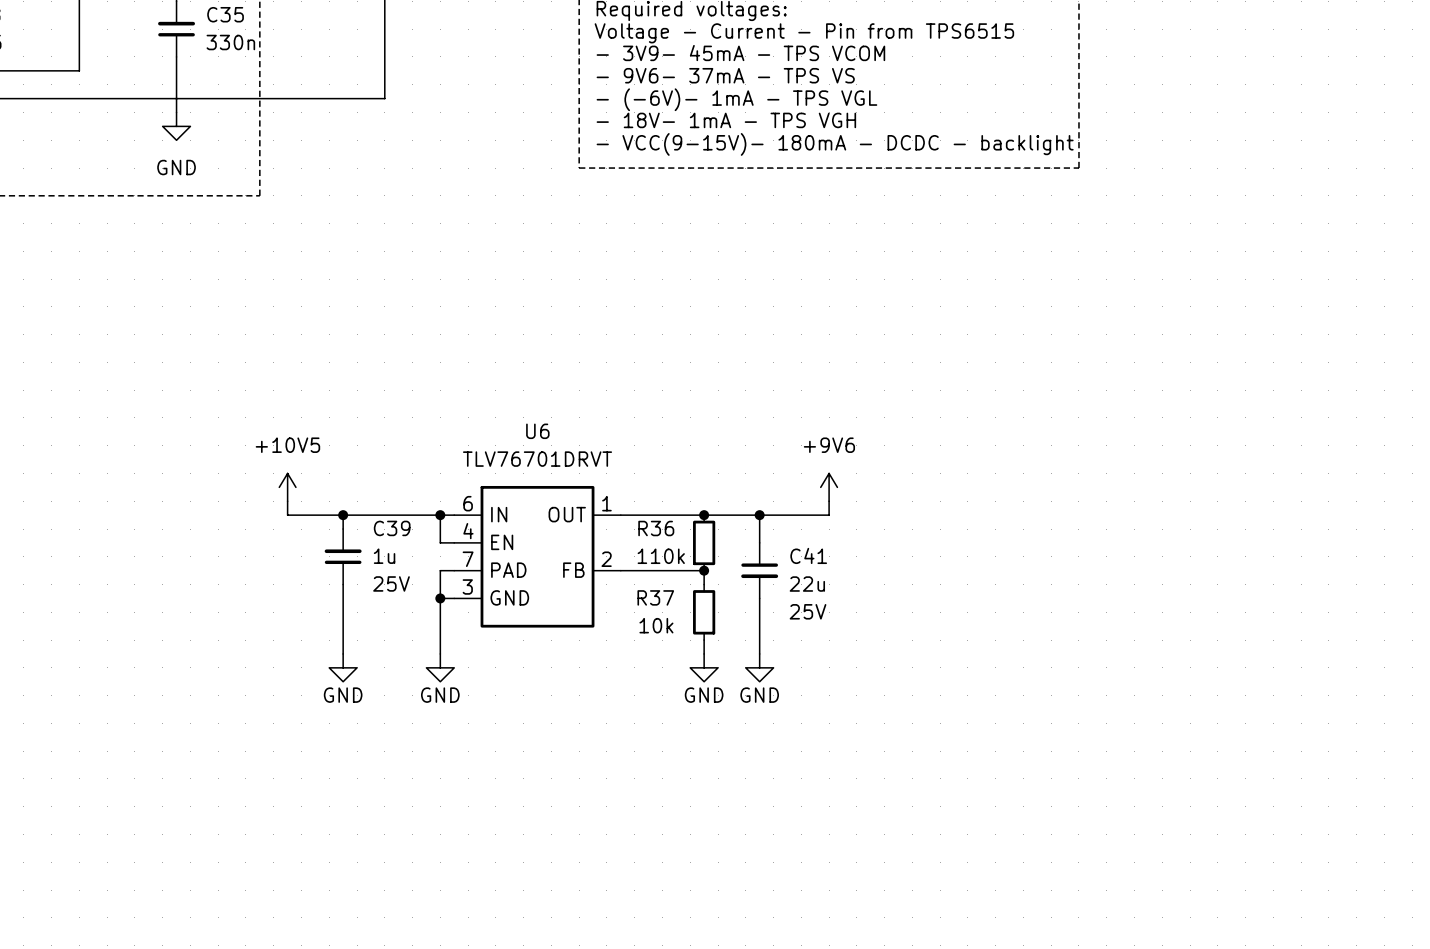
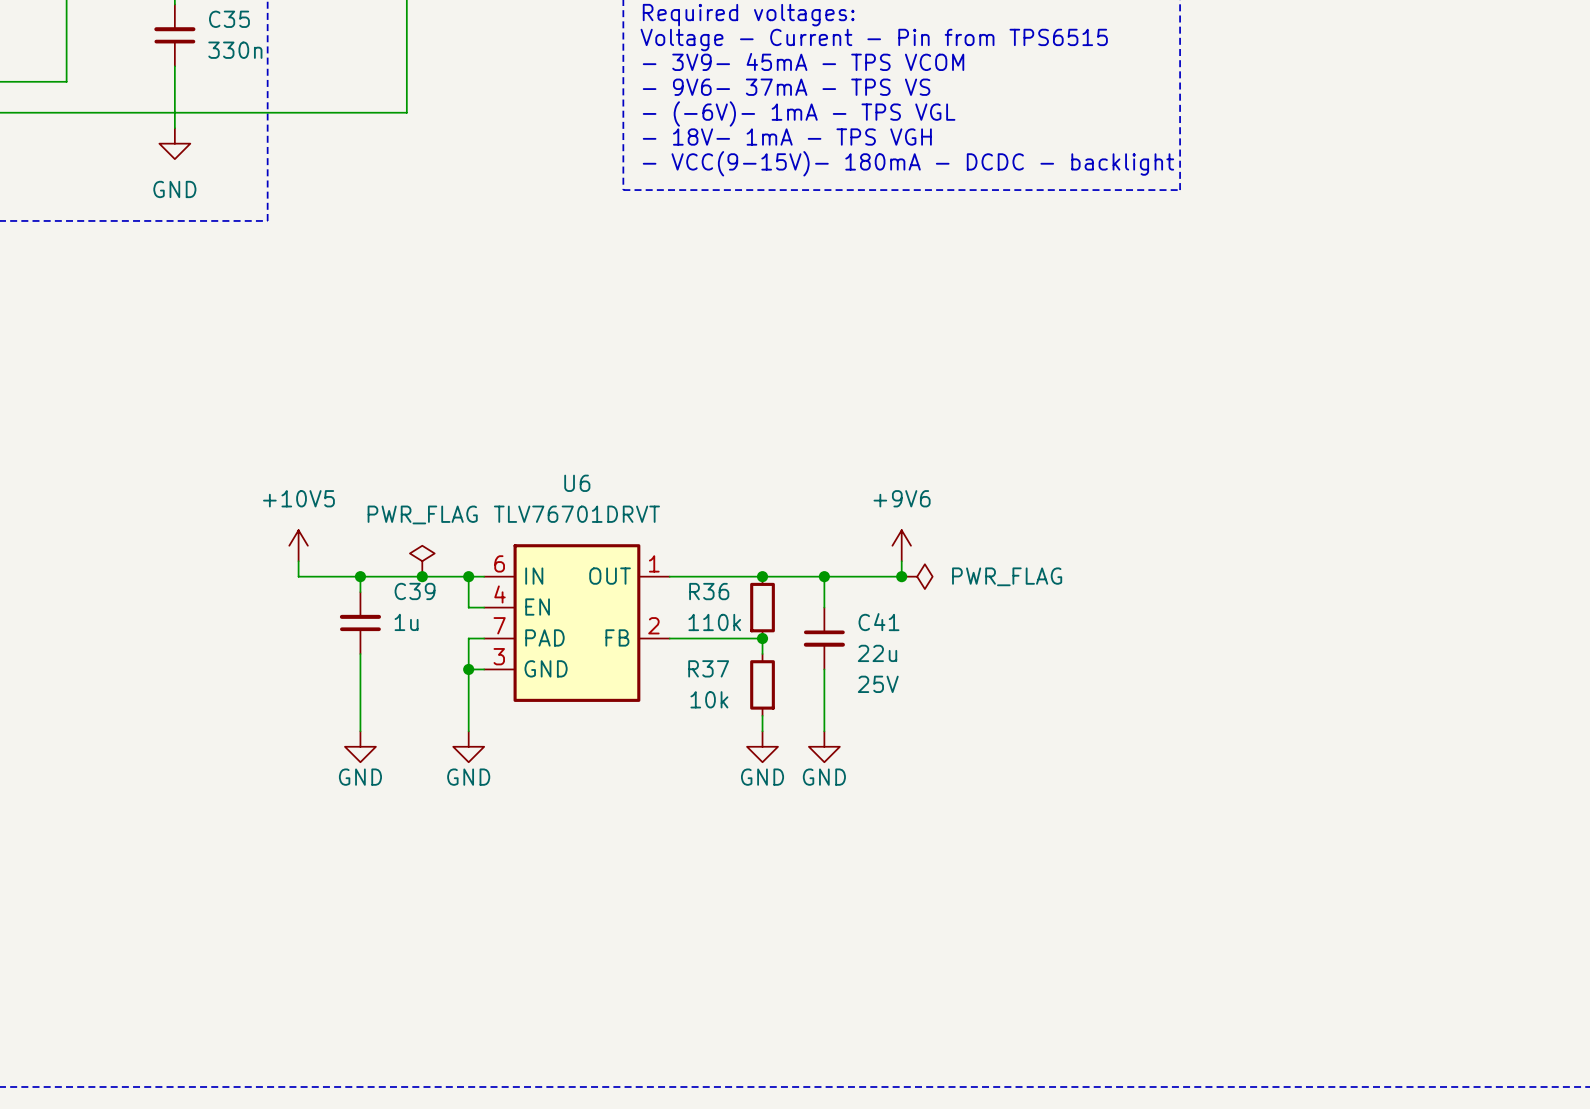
power symbol: none -> PWR_FLAG (422, 561)
junction: none -> (422, 576)
junction: none -> (901, 576)
power symbol: none -> PWR_FLAG (917, 576)
C39 text: 25V (391, 583) -> none

